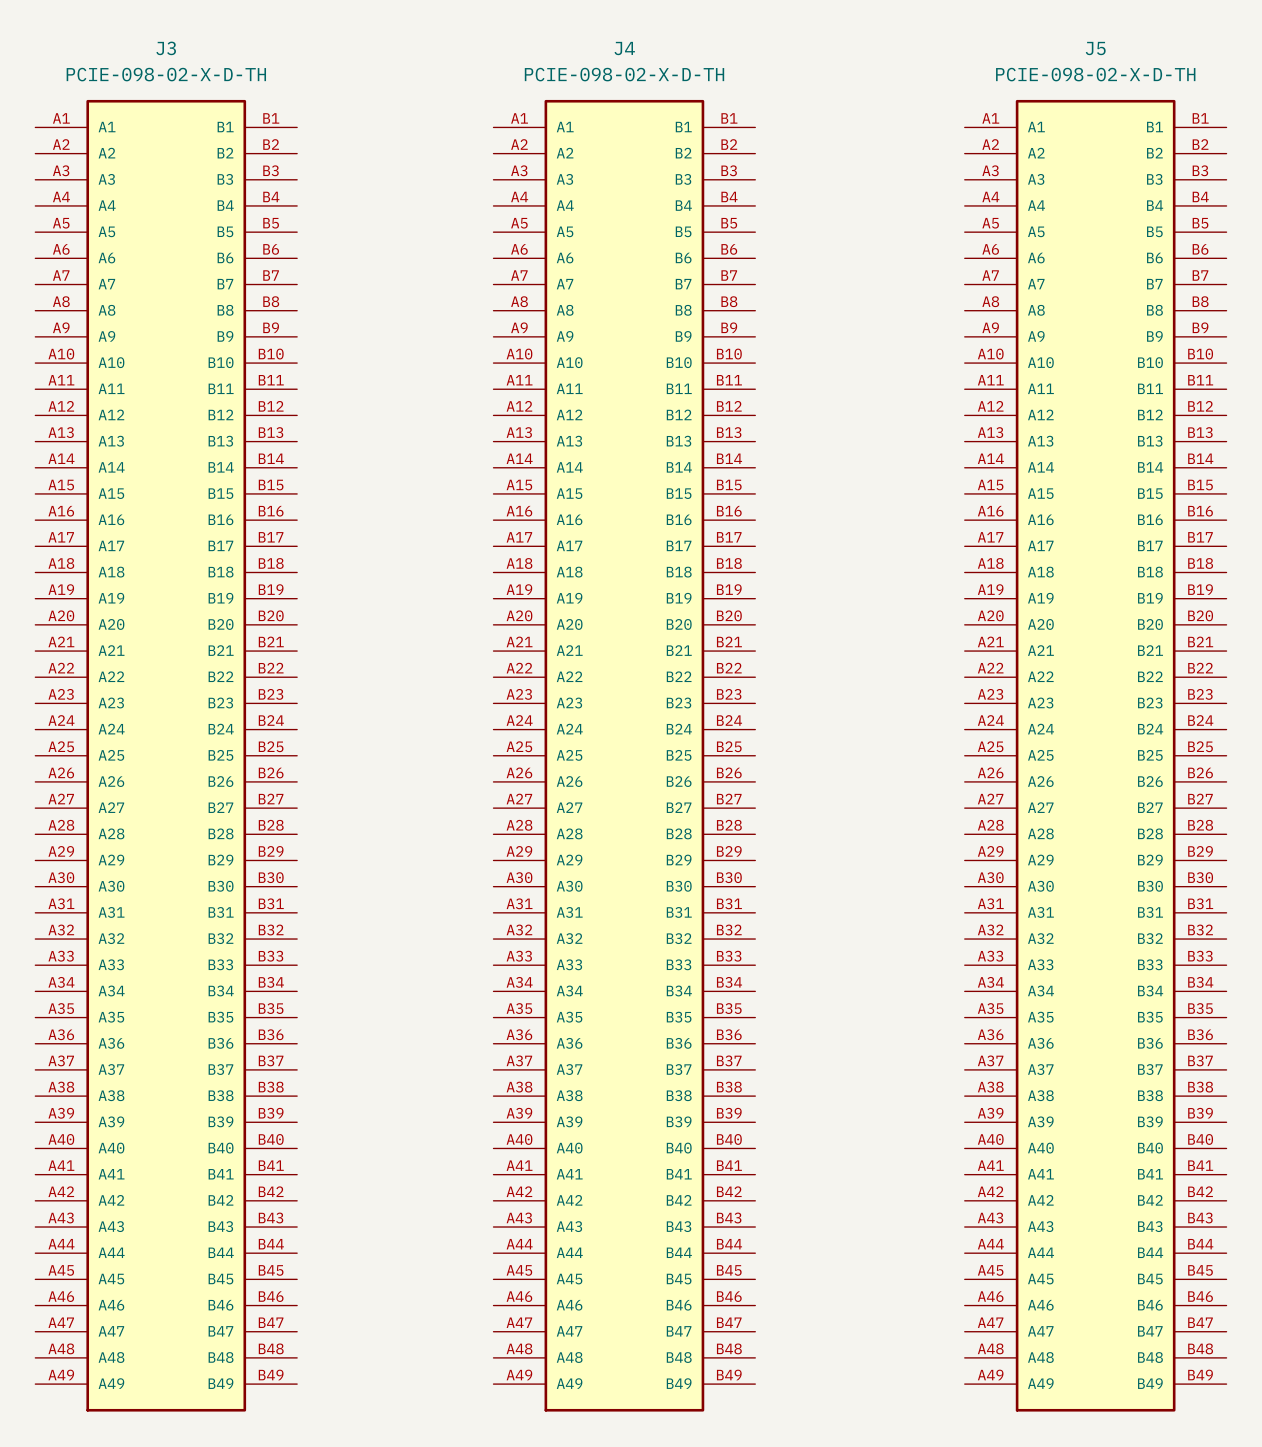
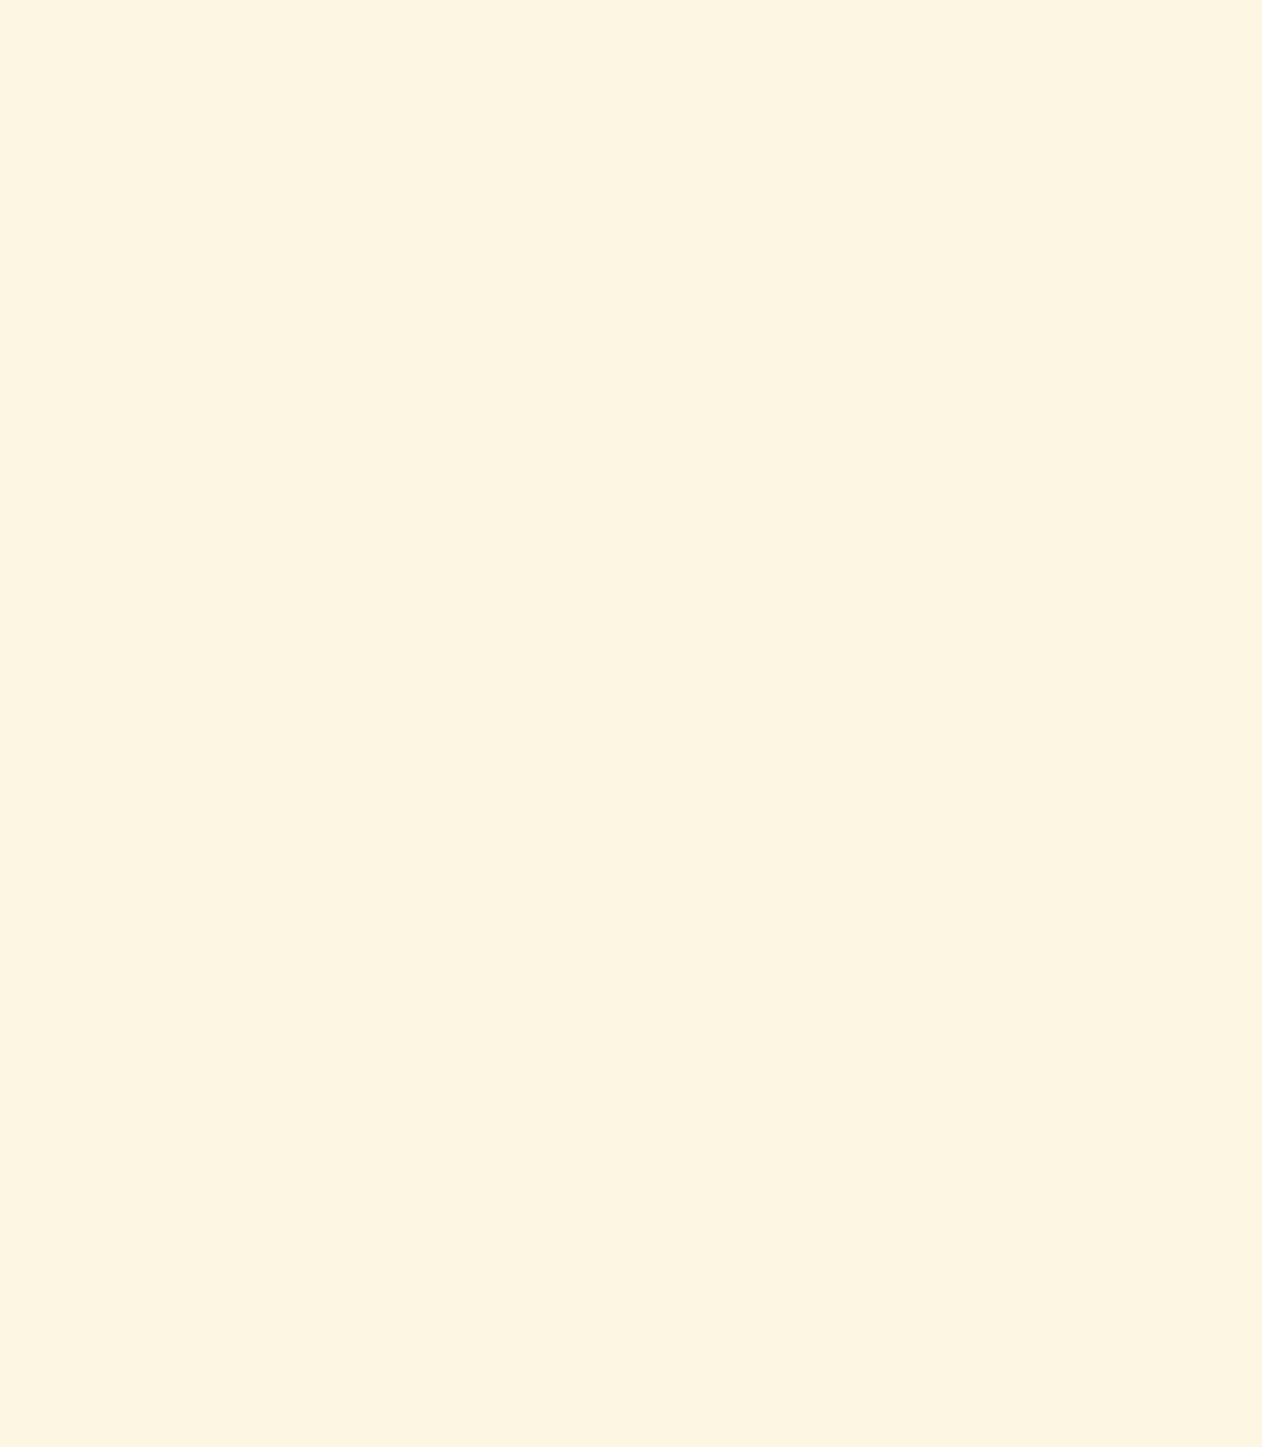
J3: PCIE-098-02-X-D-TH (166, 755) -> none
J4: PCIE-098-02-X-D-TH (624, 755) -> none
J5: PCIE-098-02-X-D-TH (1095, 755) -> none

